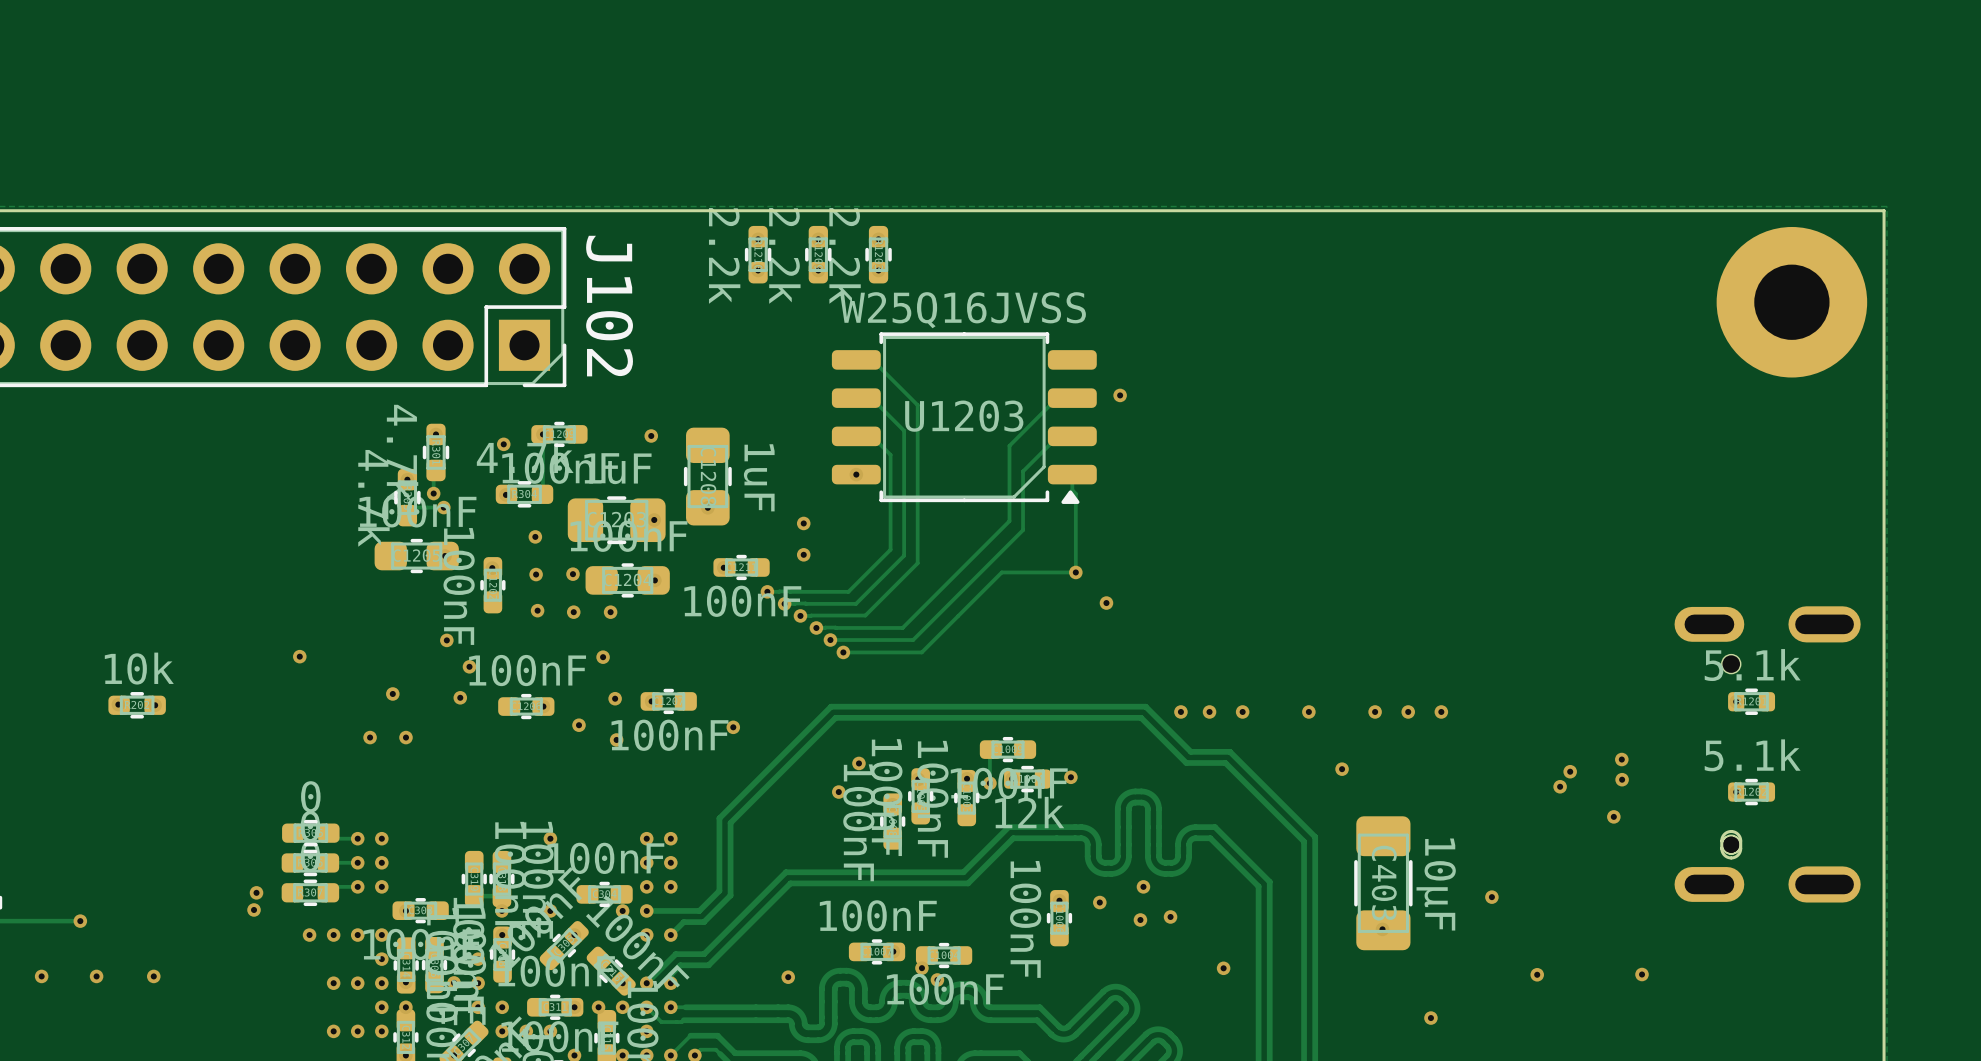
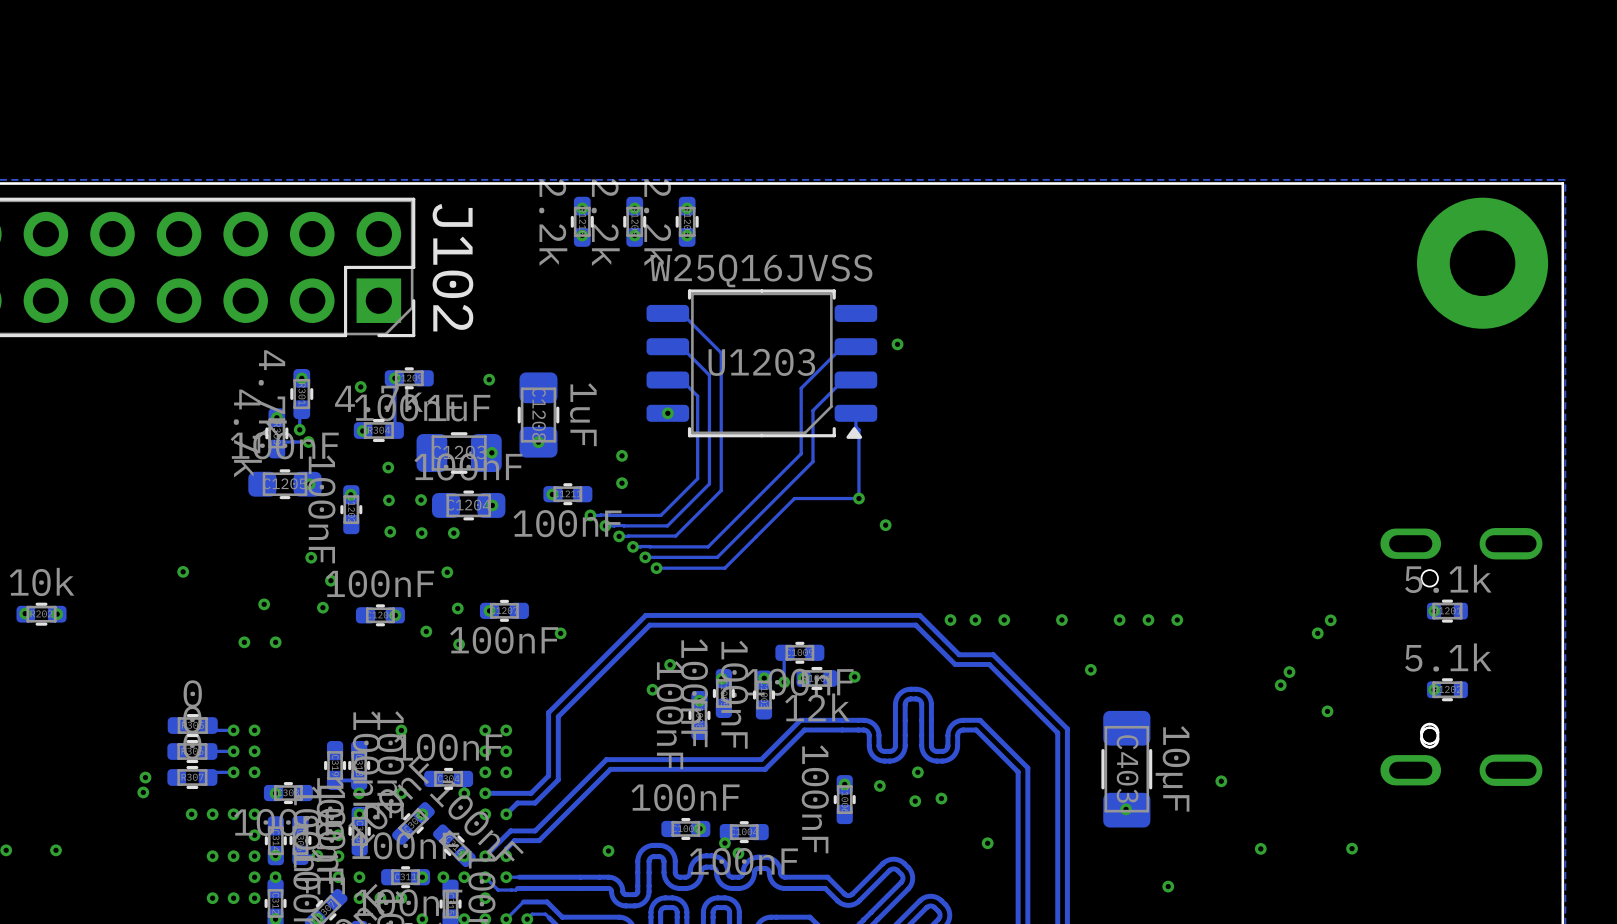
via: none -> (1330, 620)
via: none -> (1317, 633)
via: (1621, 759) -> none
via: (1622, 779) -> none

